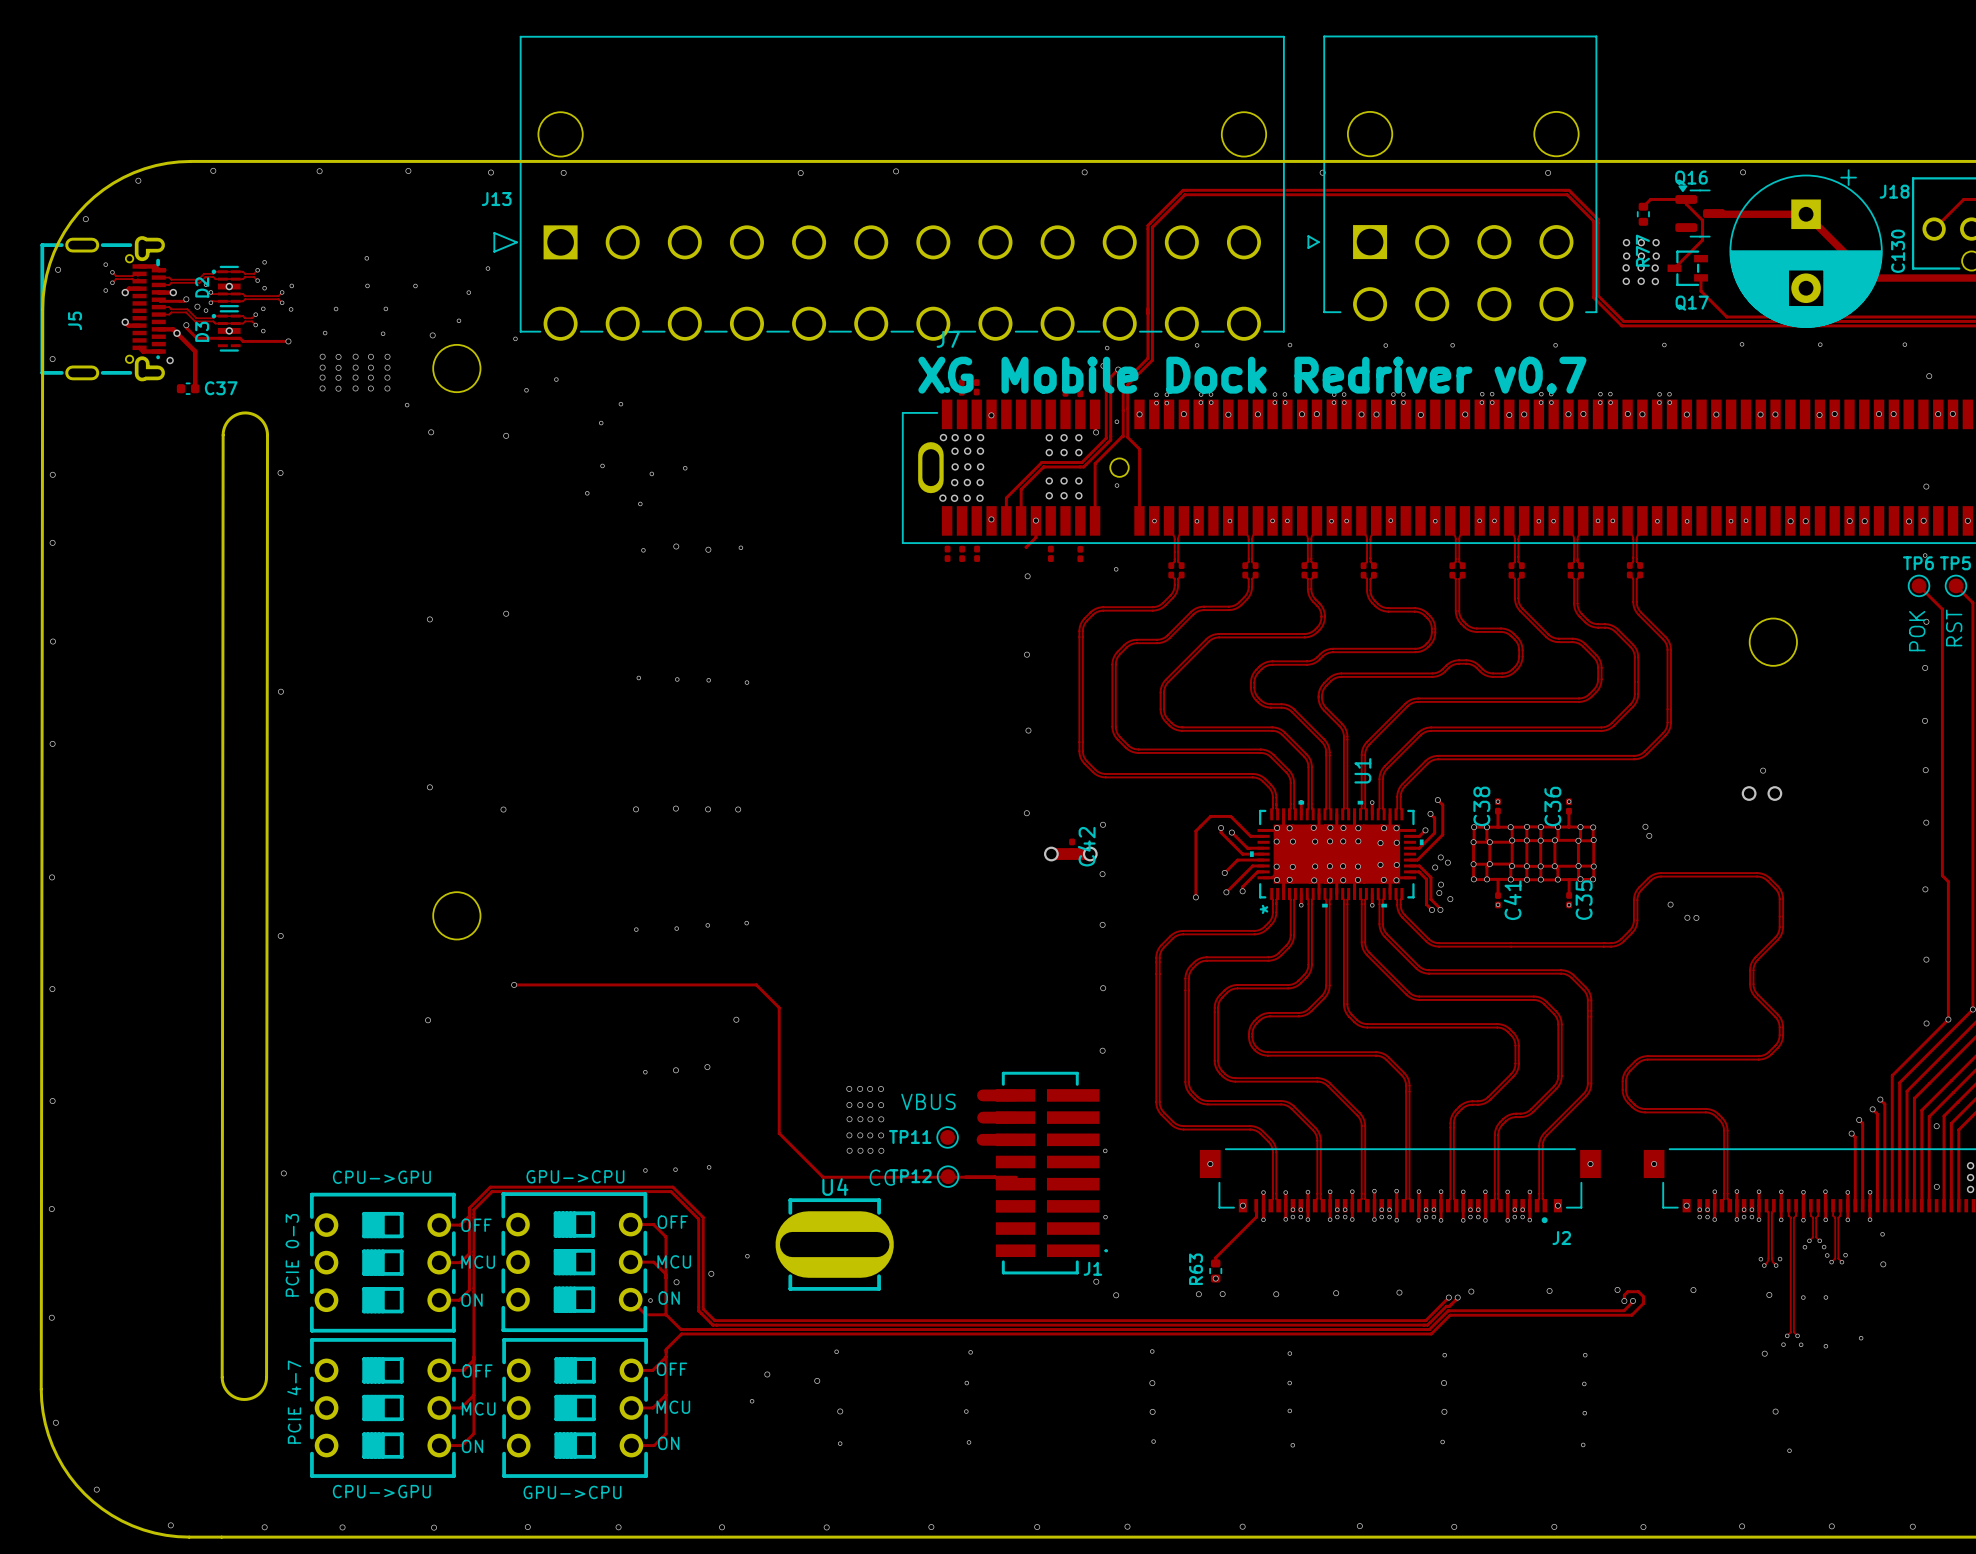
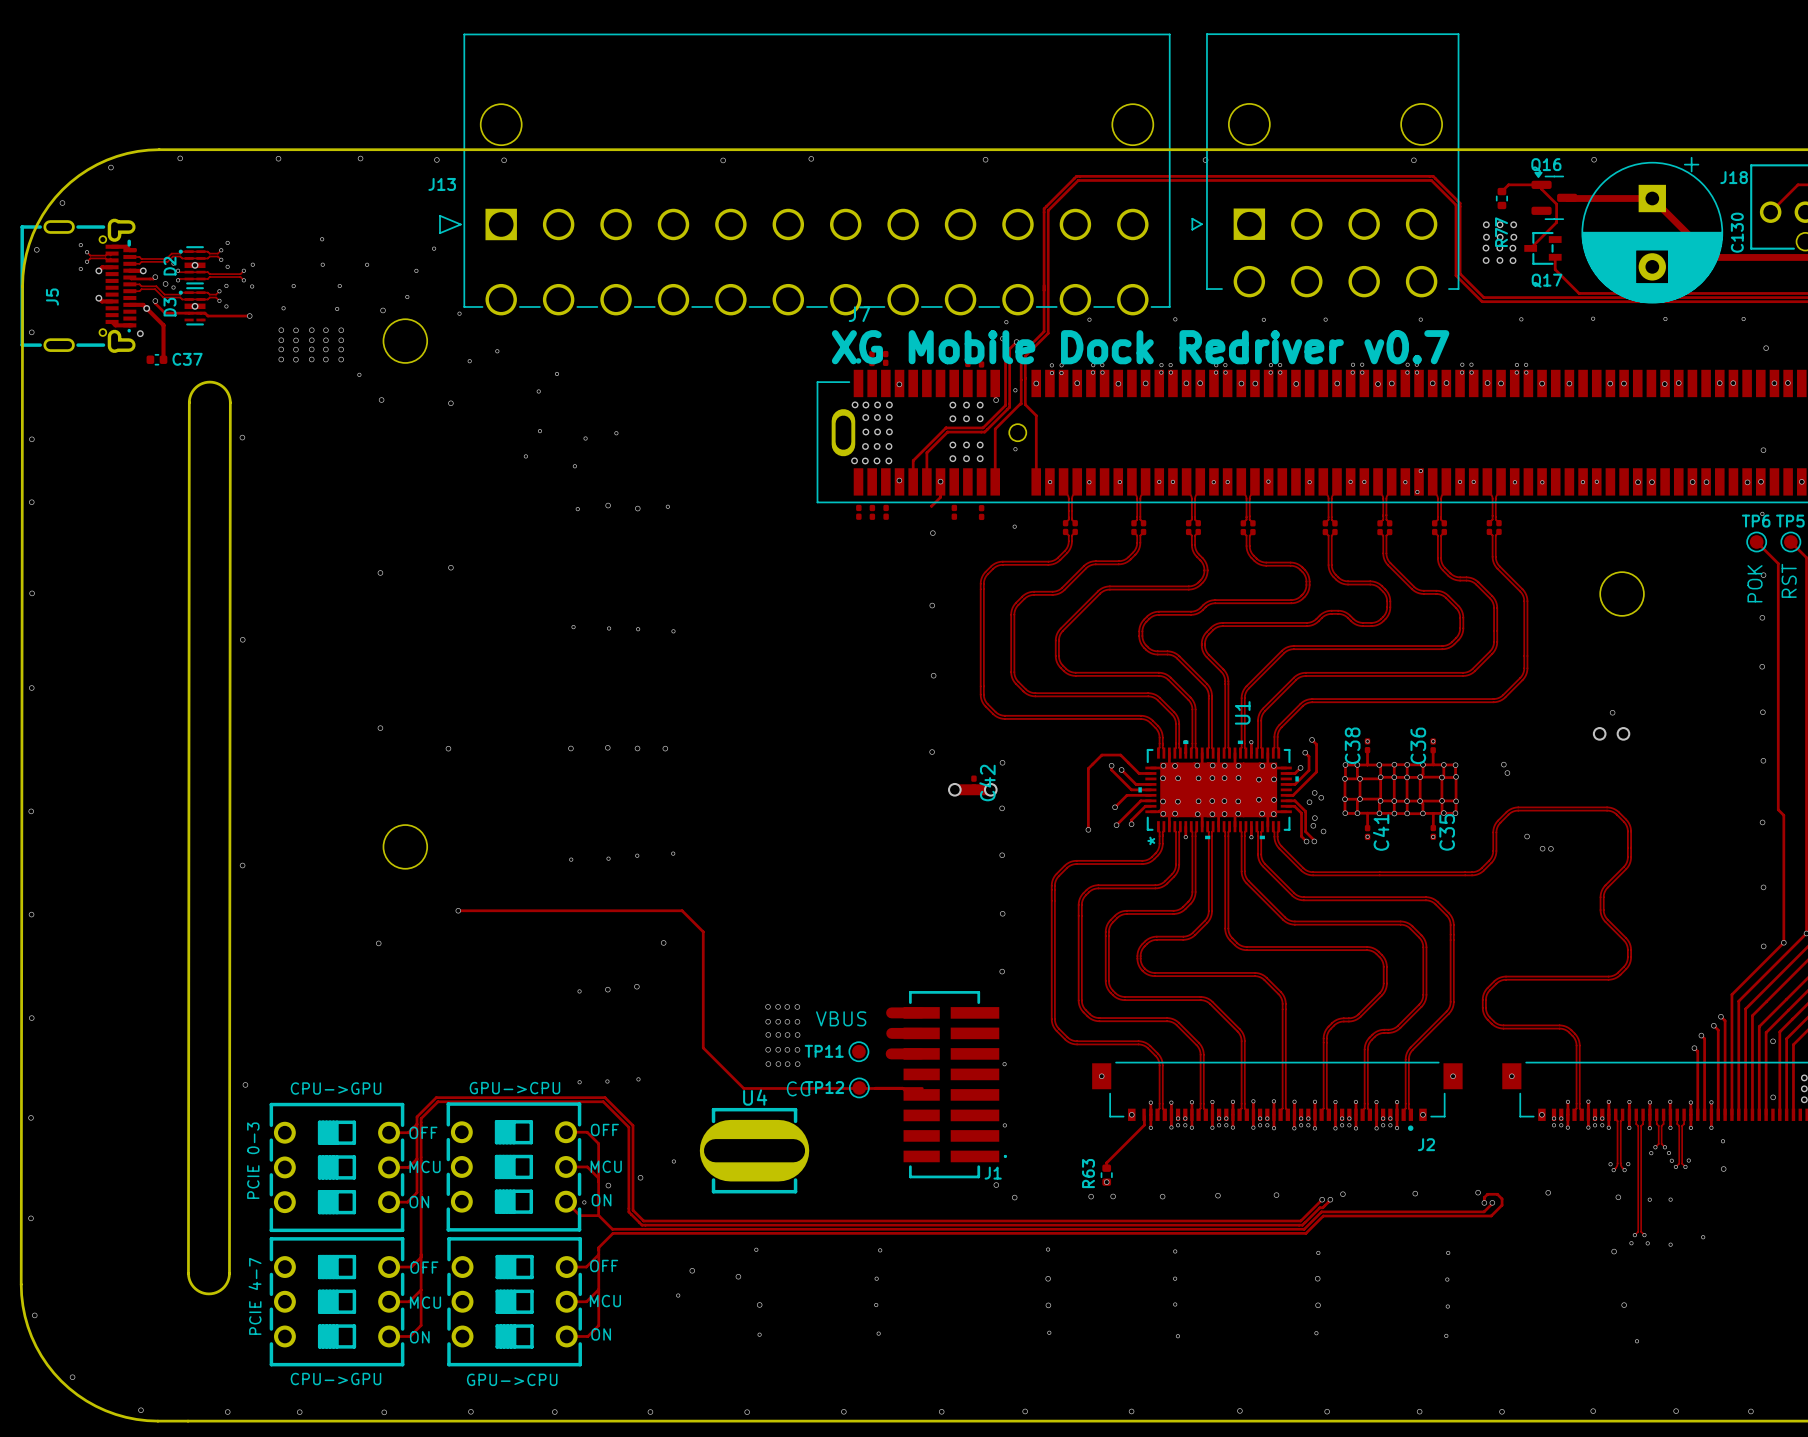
via: none -> (1420, 471)
via: (1553, 521) -> none
via: none -> (1417, 492)

